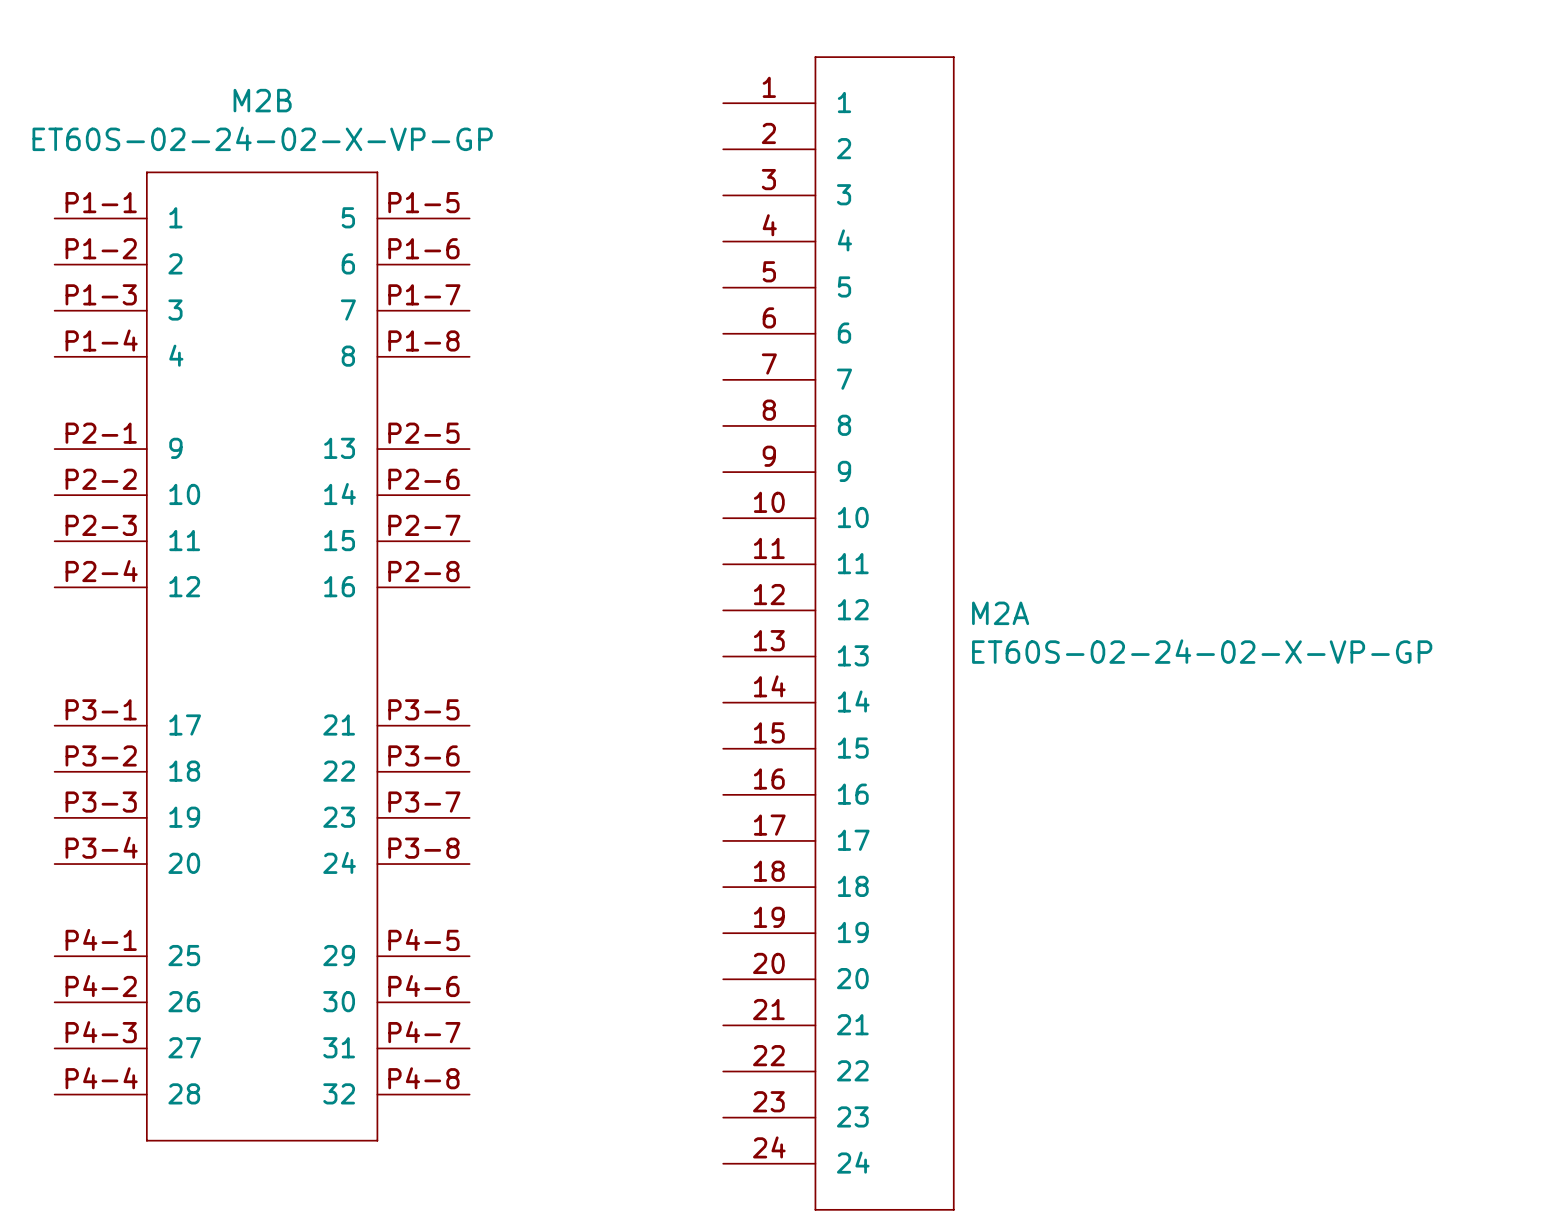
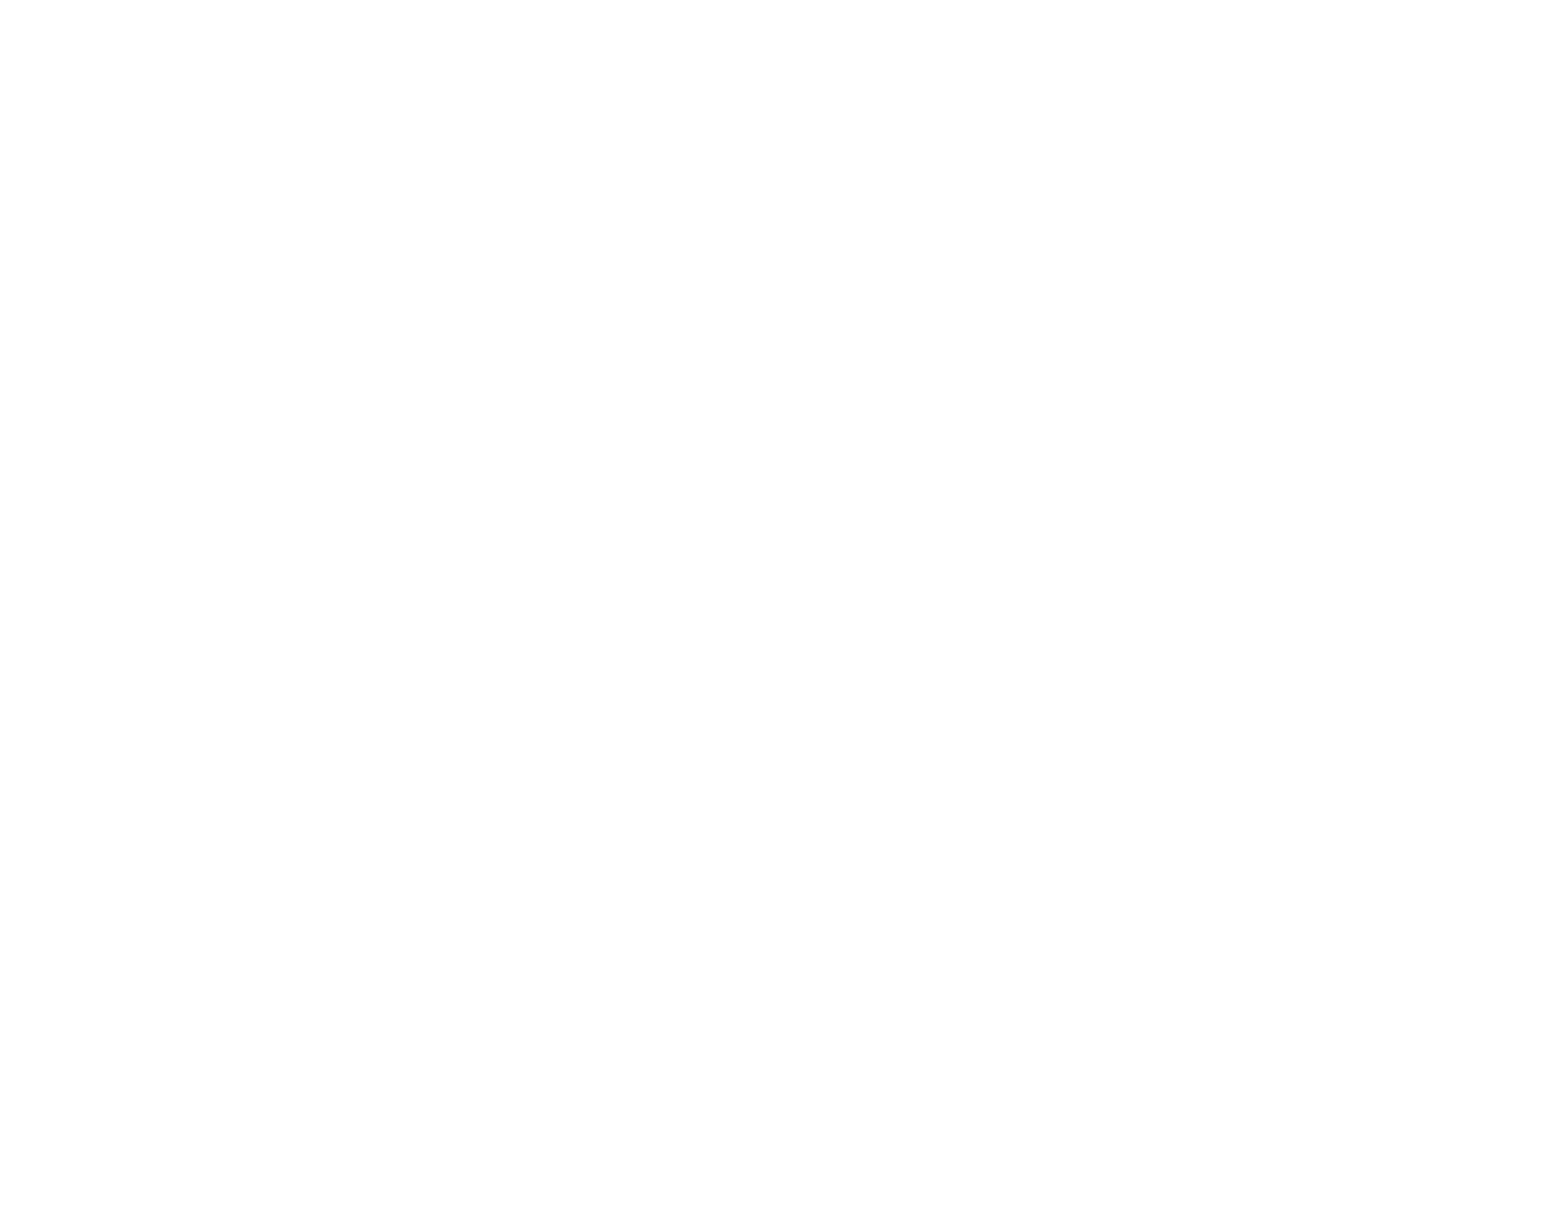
M2A: ET60S-02-24-02-X-VP-GP (838, 633) -> none
M2B: ET60S-02-24-02-X-VP-GP (262, 656) -> none

